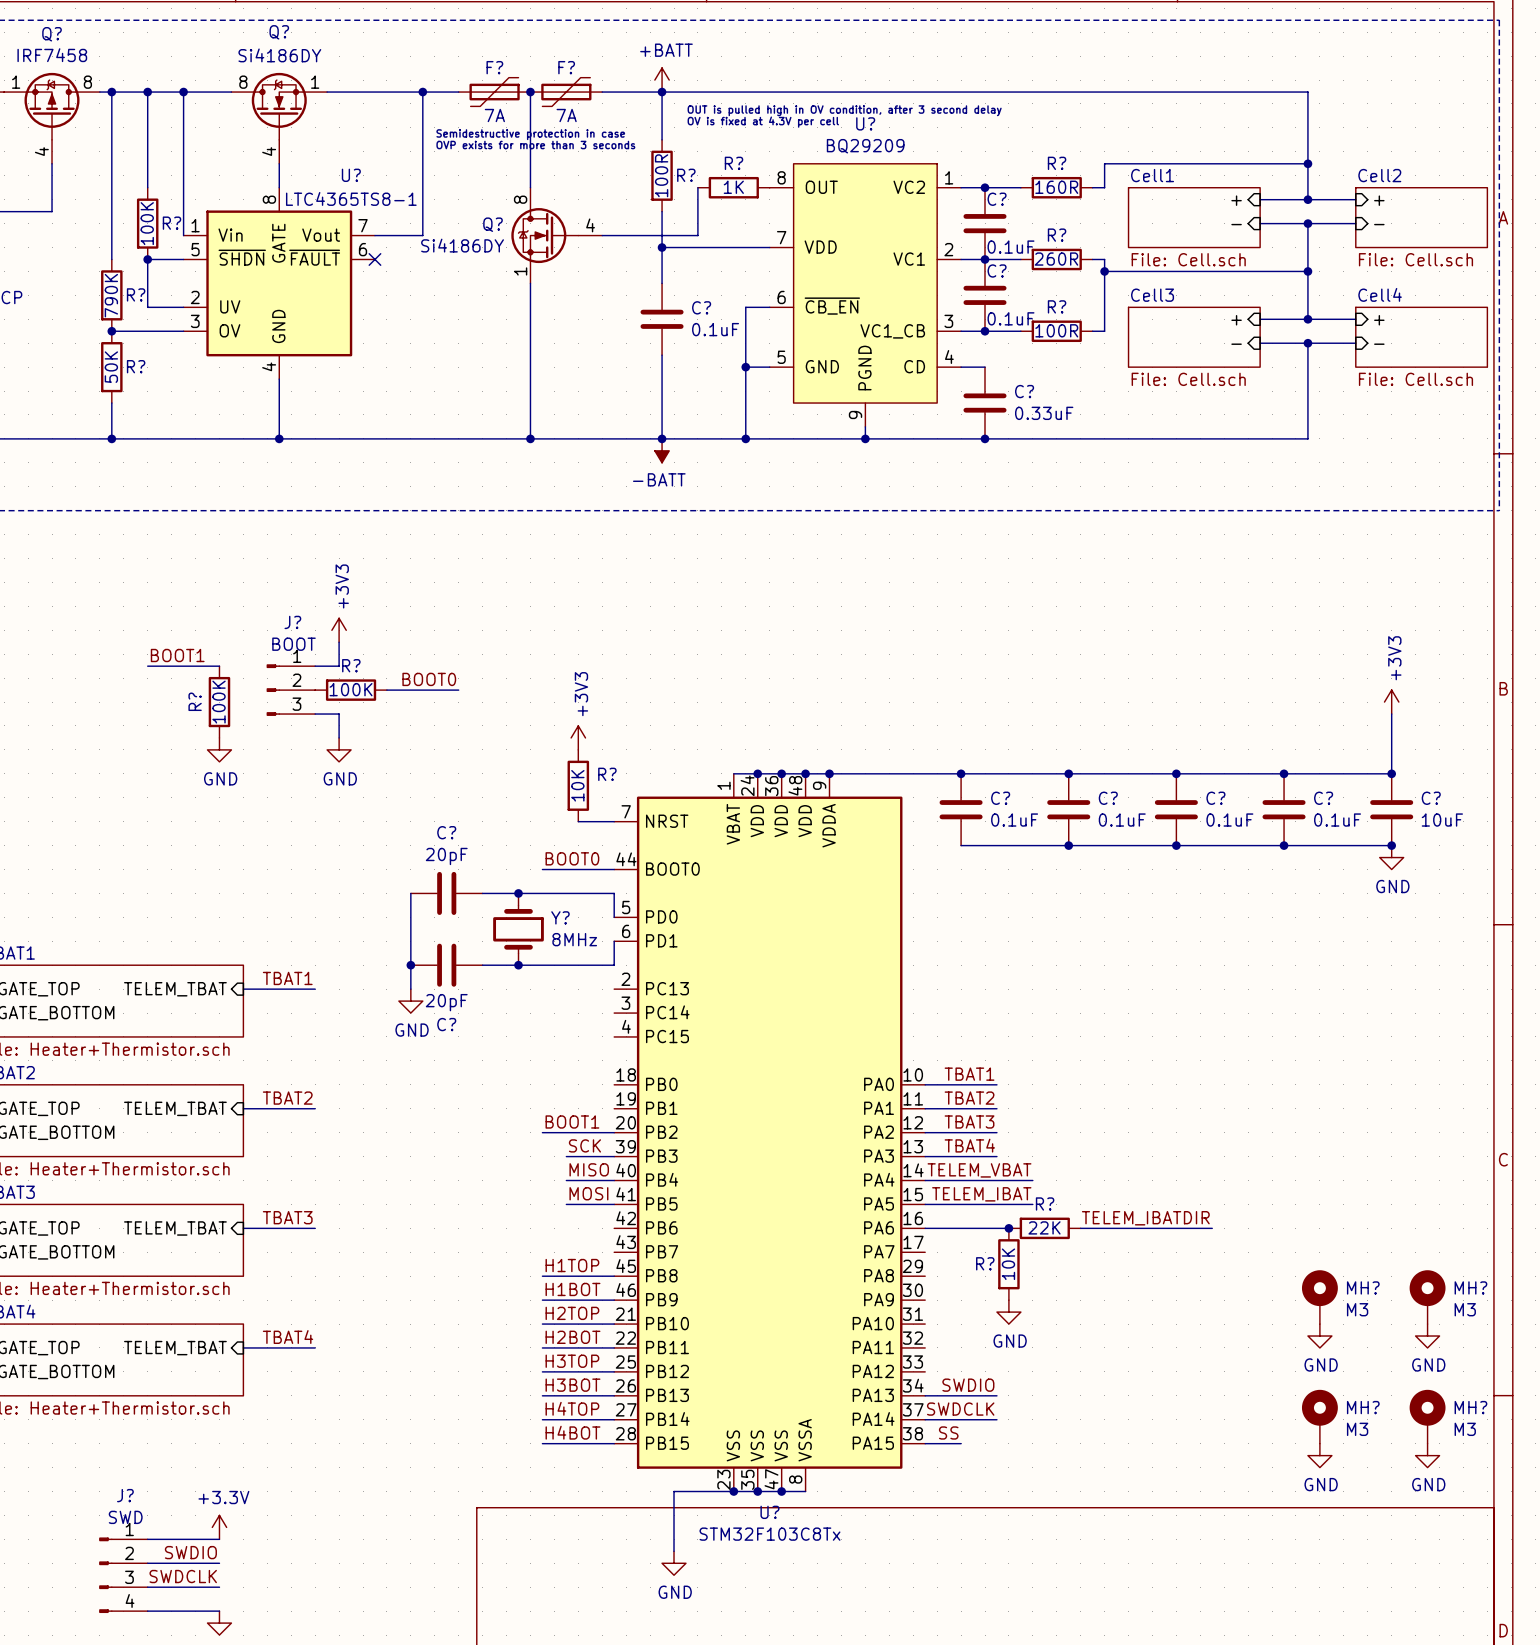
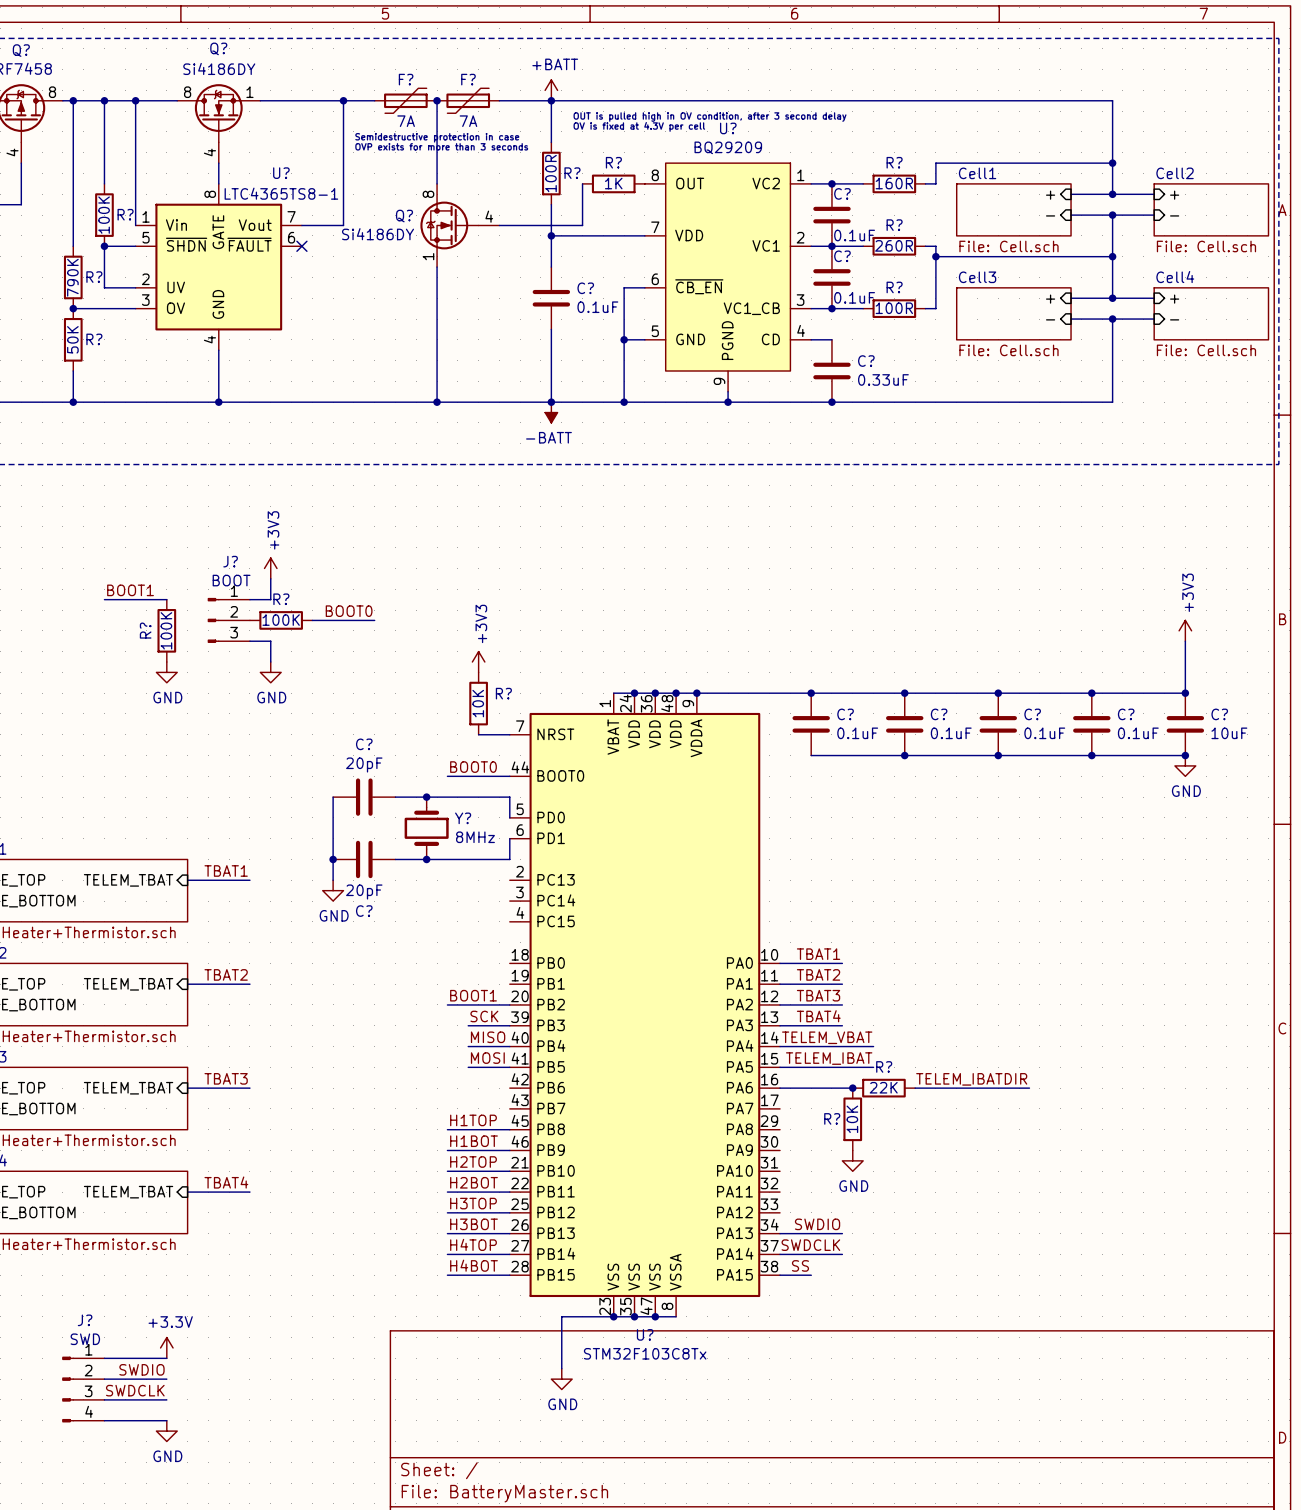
MH?: M3 (1319, 1297) -> none
MH?: M3 (1427, 1297) -> none
power symbol: GND (1319, 1336) -> none
power symbol: GND (1427, 1336) -> none
MH?: M3 (1319, 1416) -> none
MH?: M3 (1427, 1416) -> none
power symbol: GND (1319, 1455) -> none
power symbol: GND (1427, 1455) -> none

